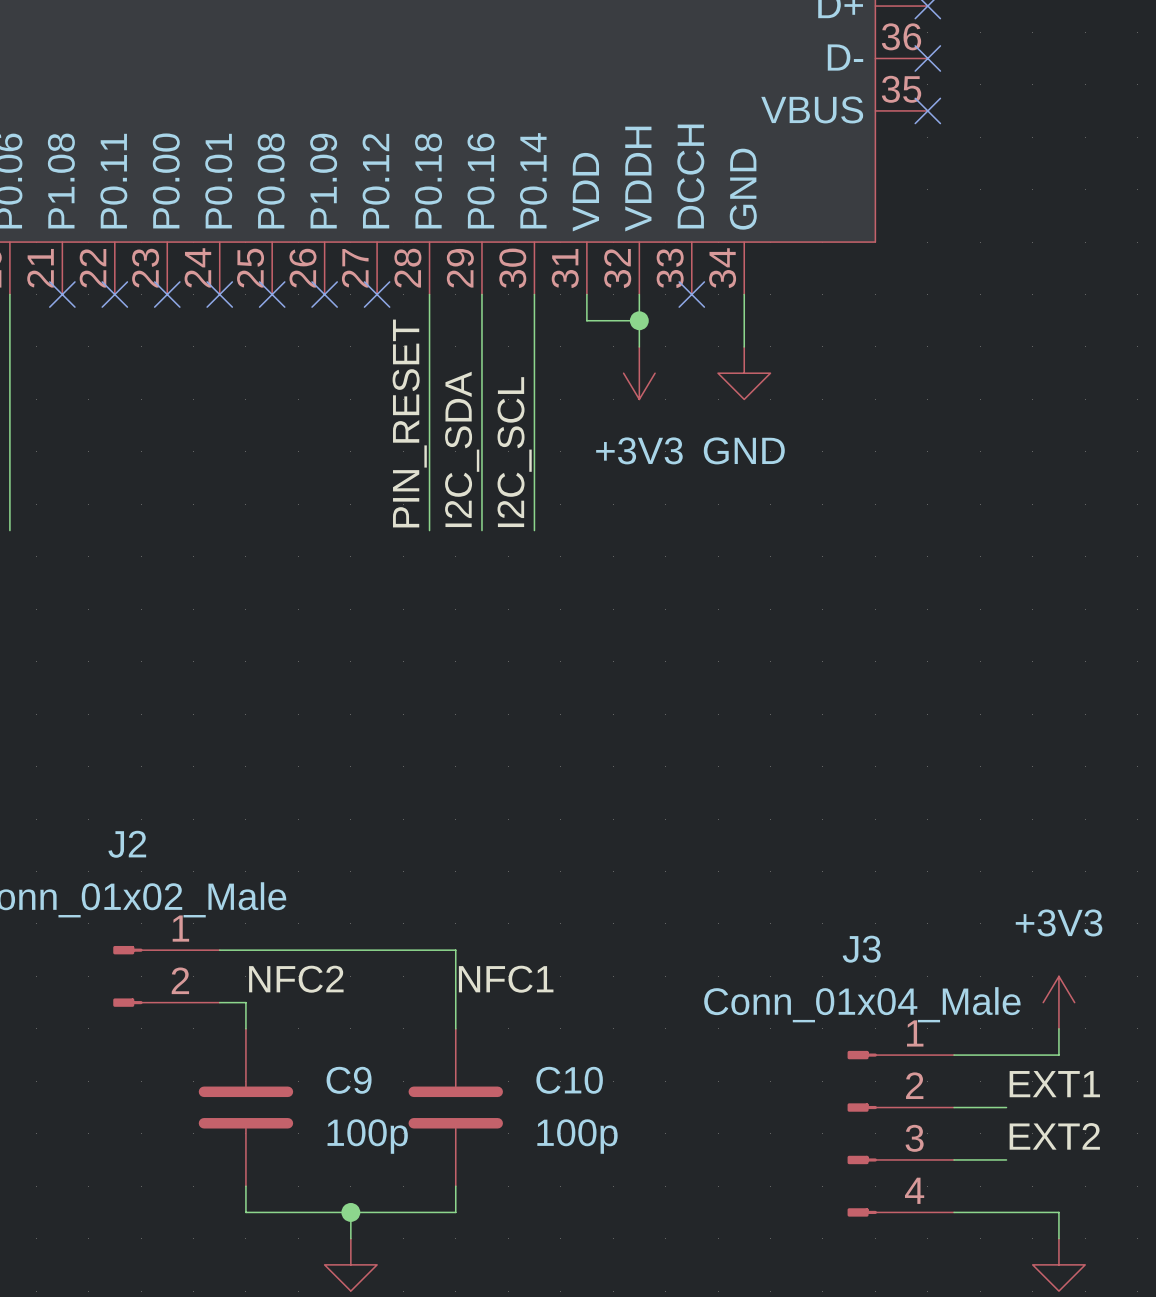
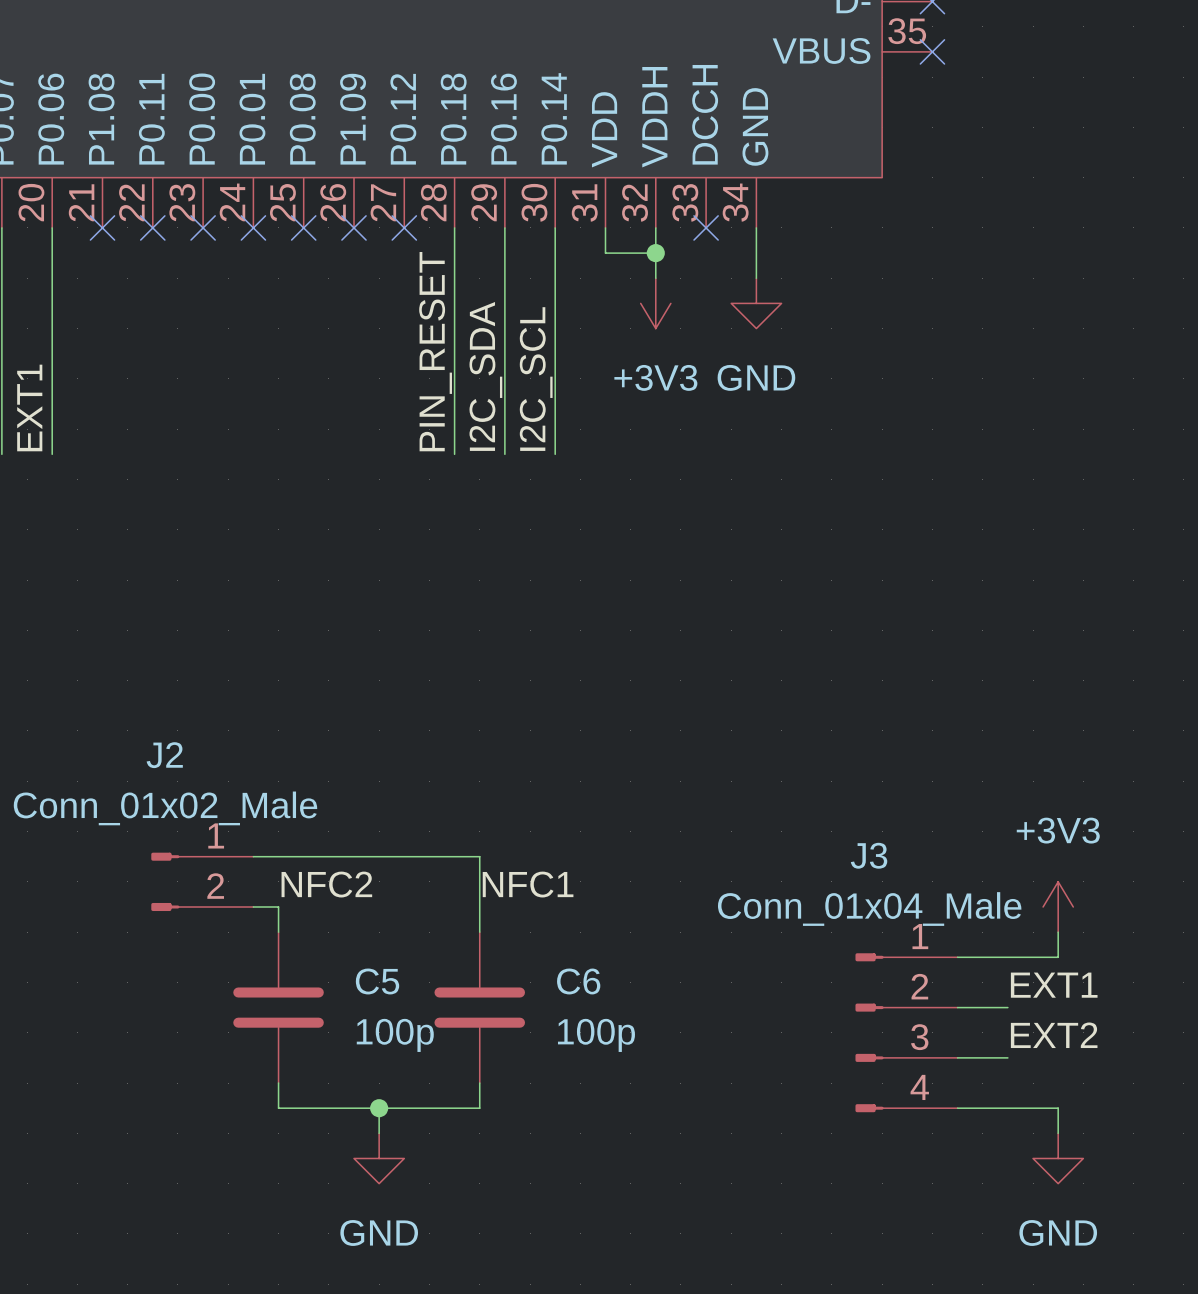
C9 name: C9 (349, 1080) -> C5 (377, 981)
C10 name: C10 (569, 1080) -> C6 (578, 981)

